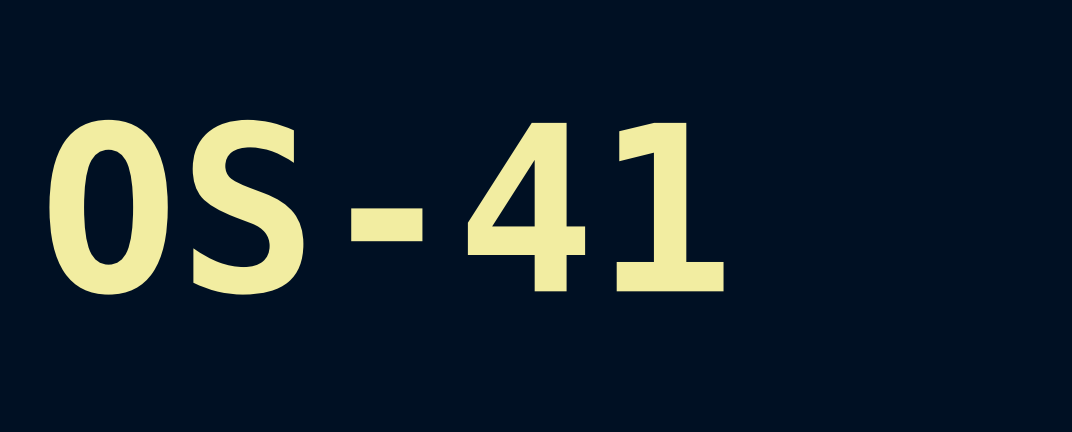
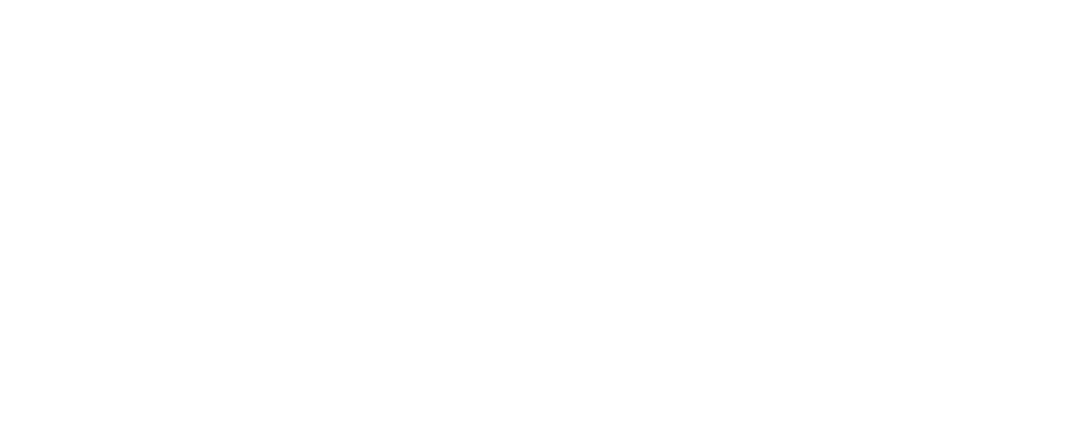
text: OS-41 (386, 207) -> none

